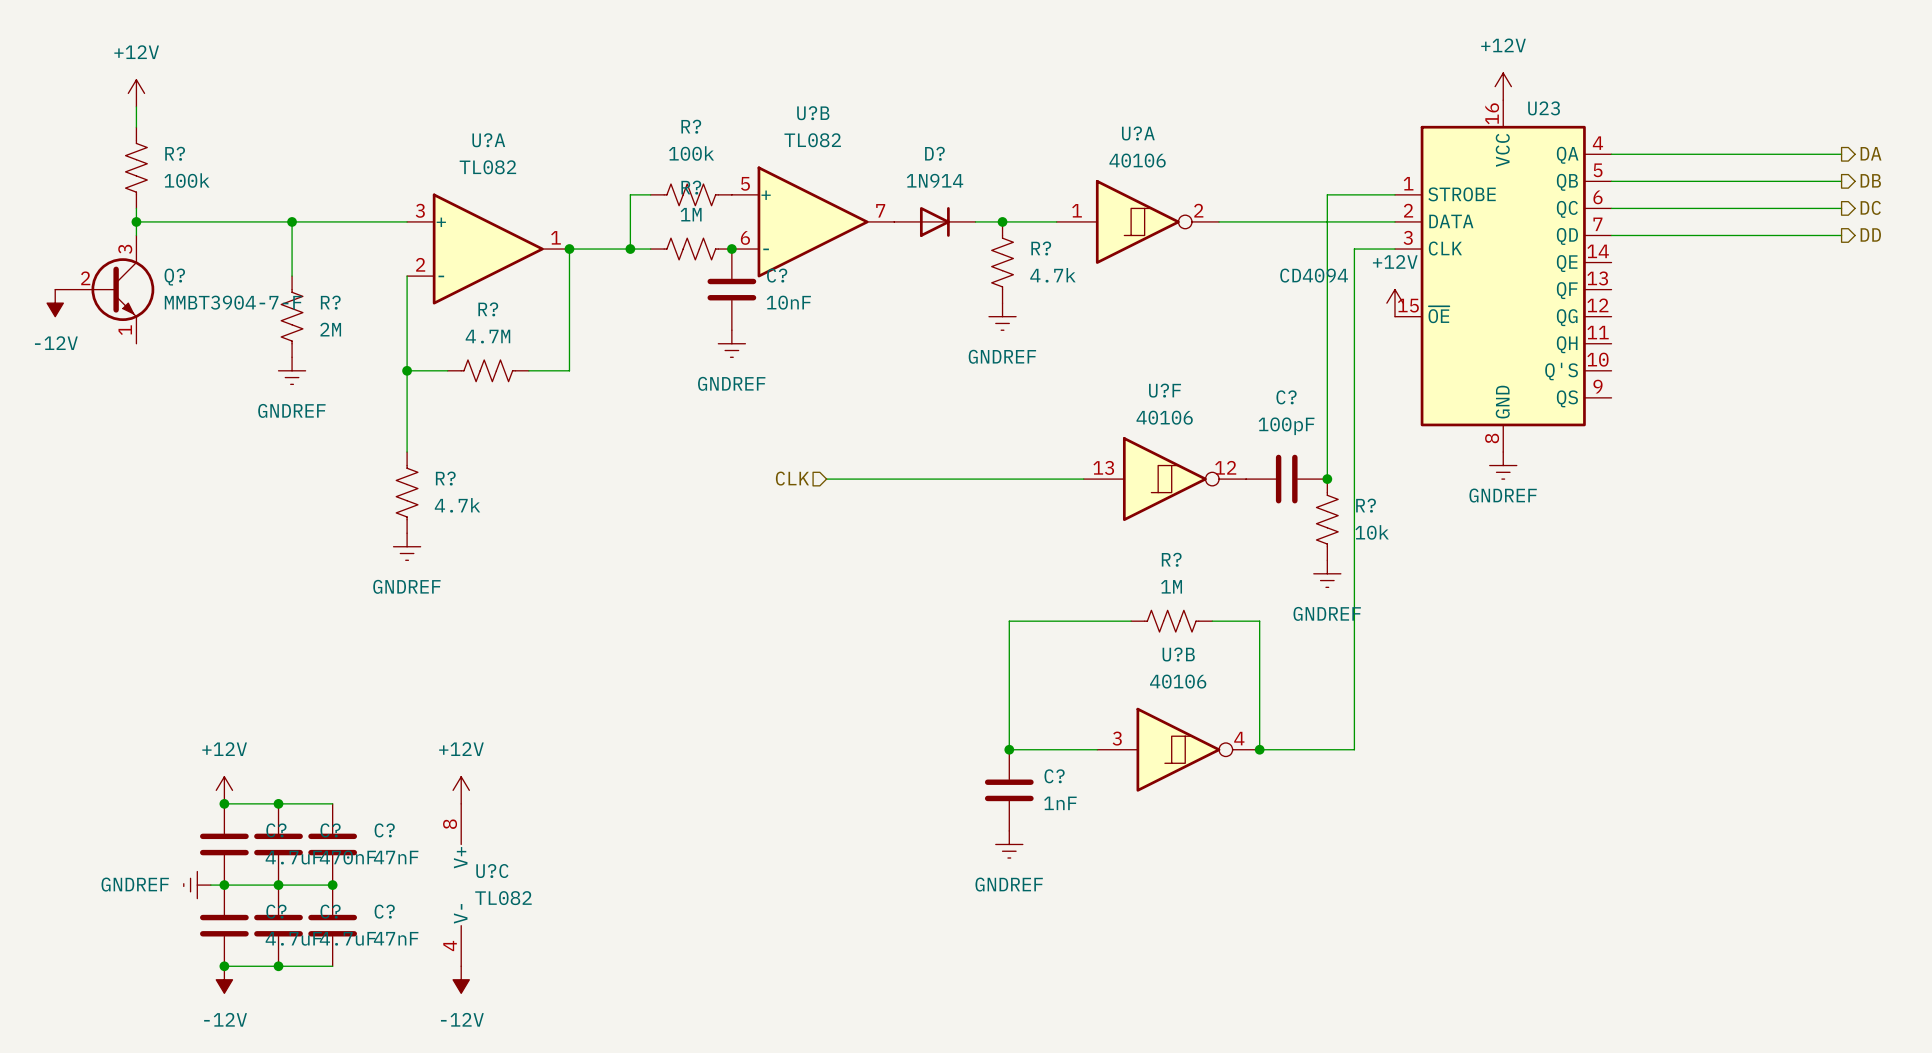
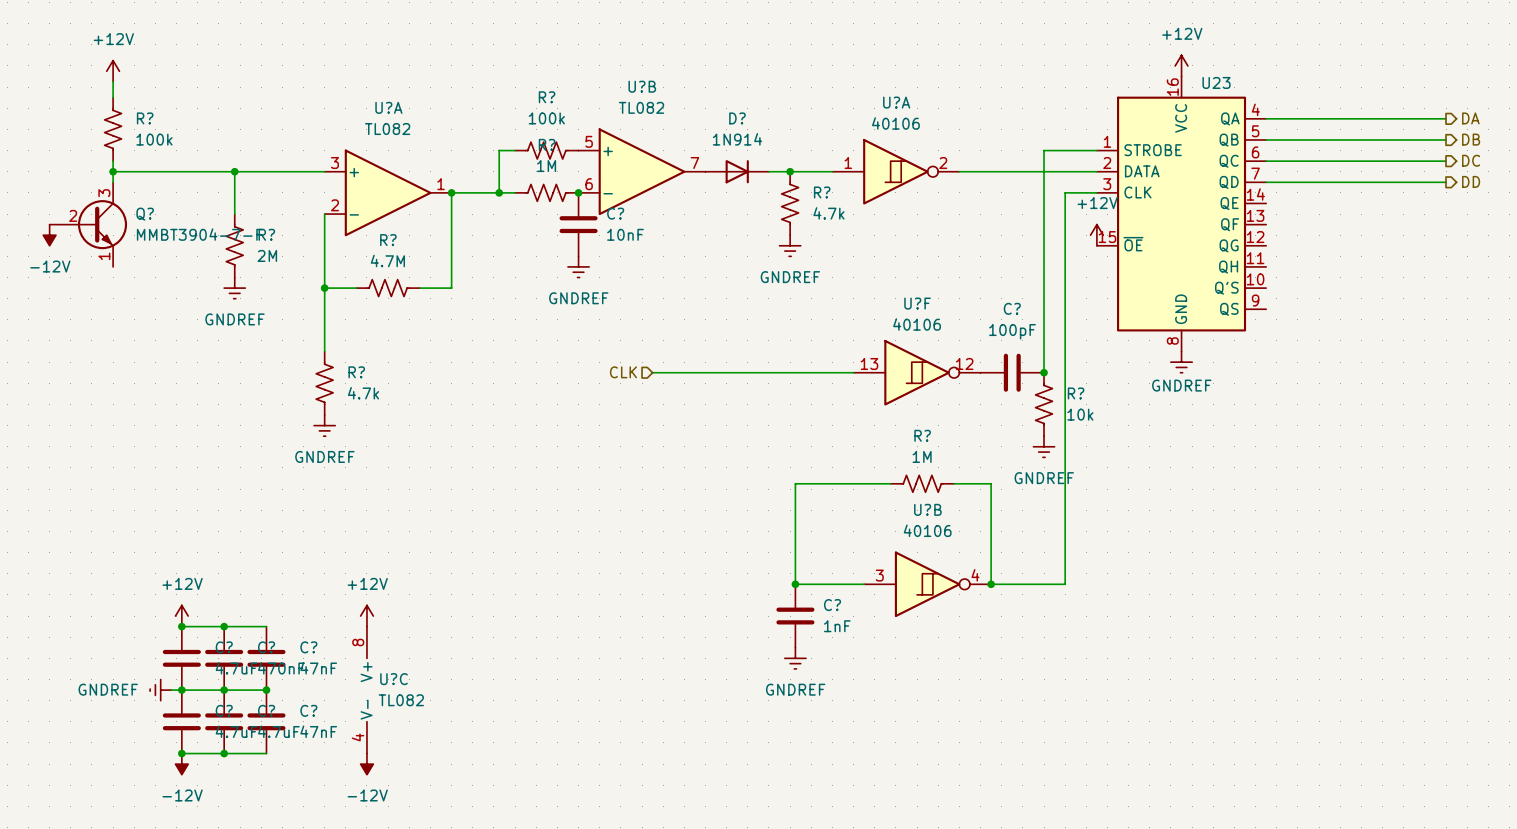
U23 value: CD4094 (1314, 275) -> none

